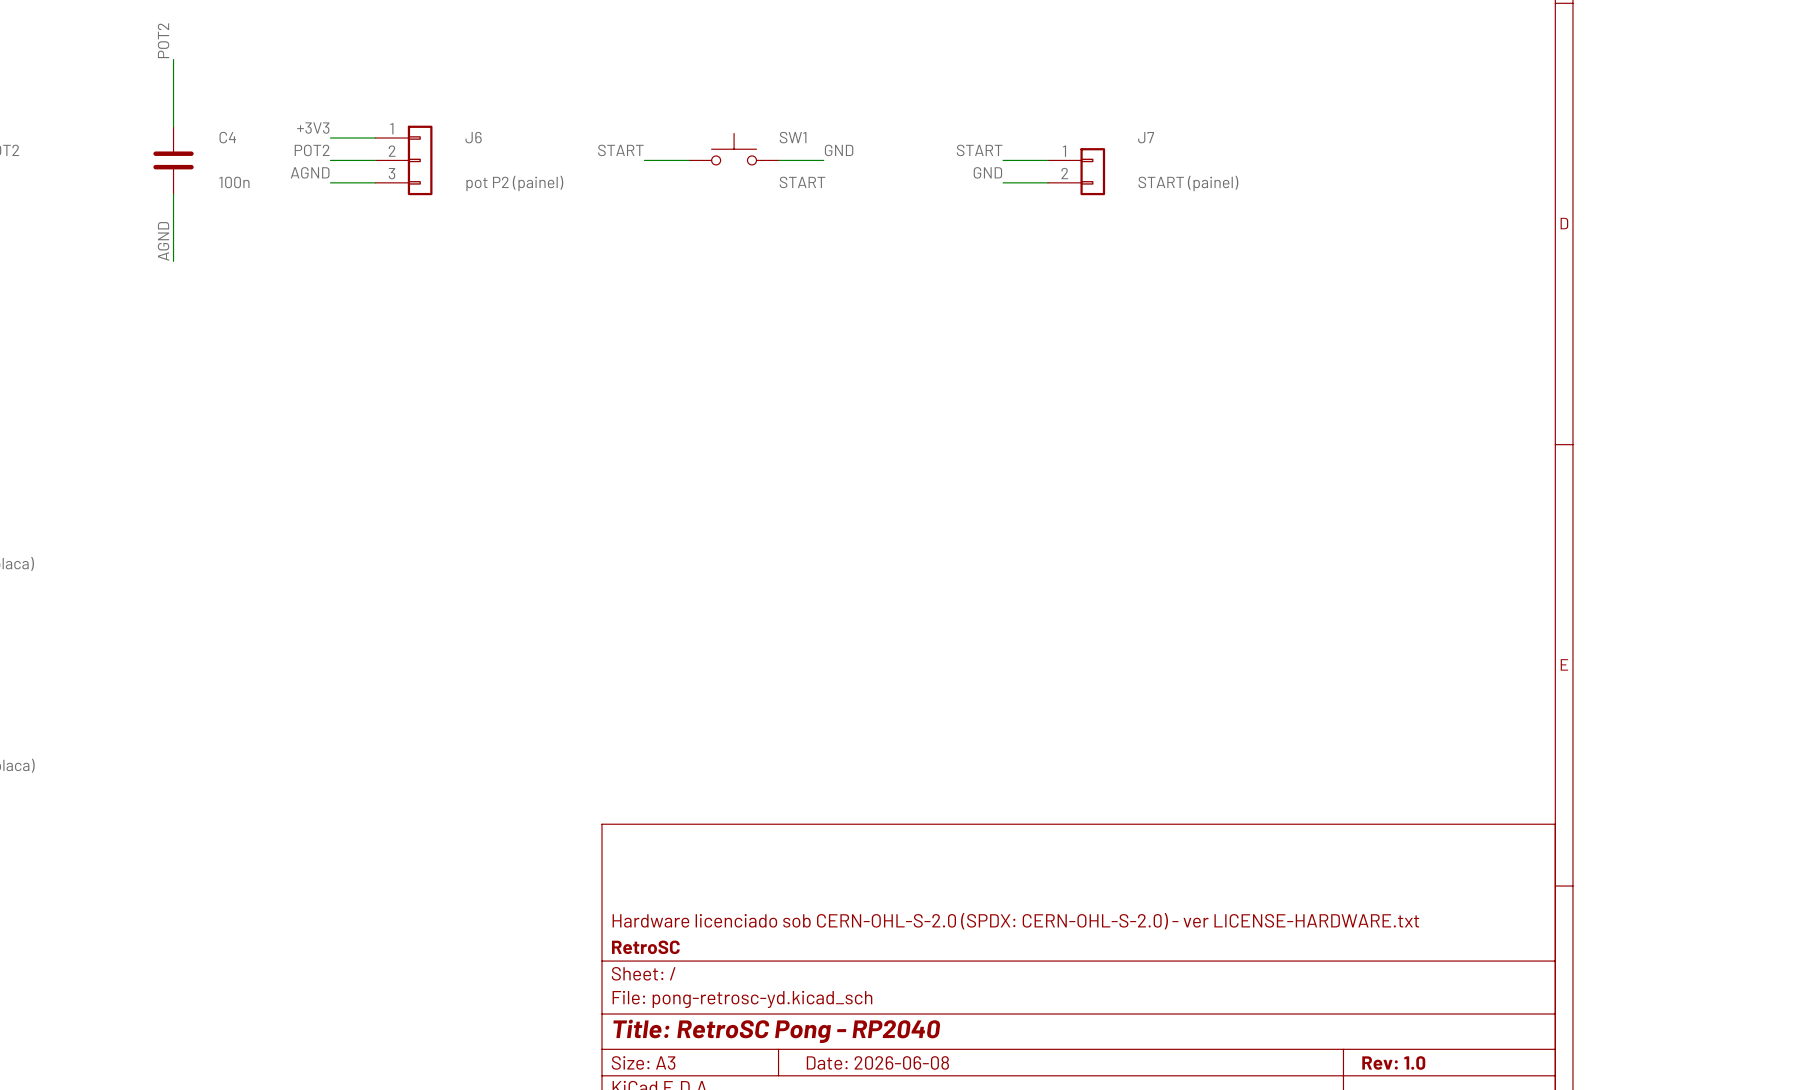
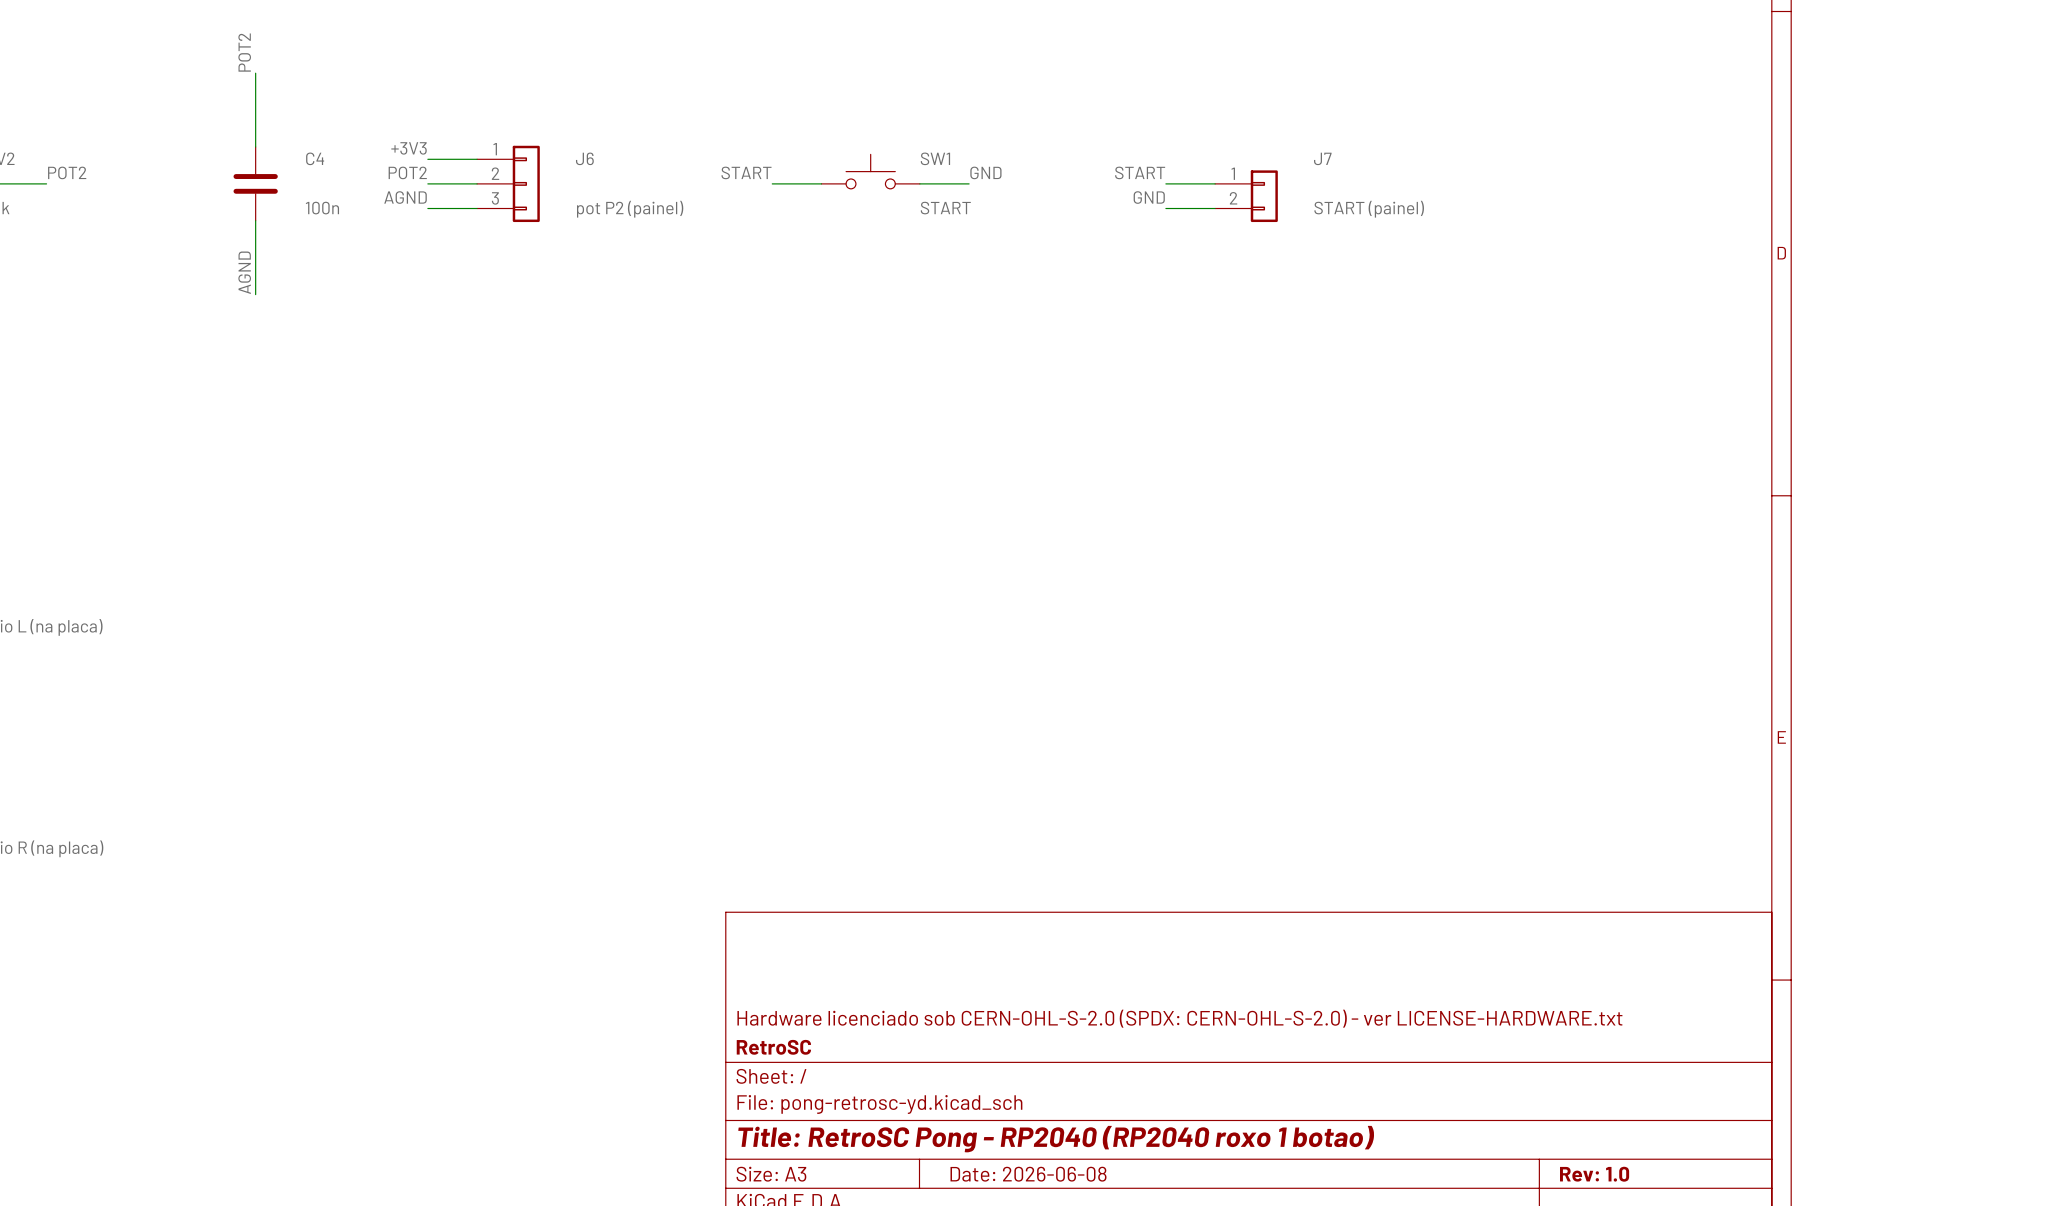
title block: Title: RetroSC Pong - RP2040 (776, 1031) -> Title: RetroSC Pong - RP2040 (RP2040 roxo 1 botao) (1056, 1139)

